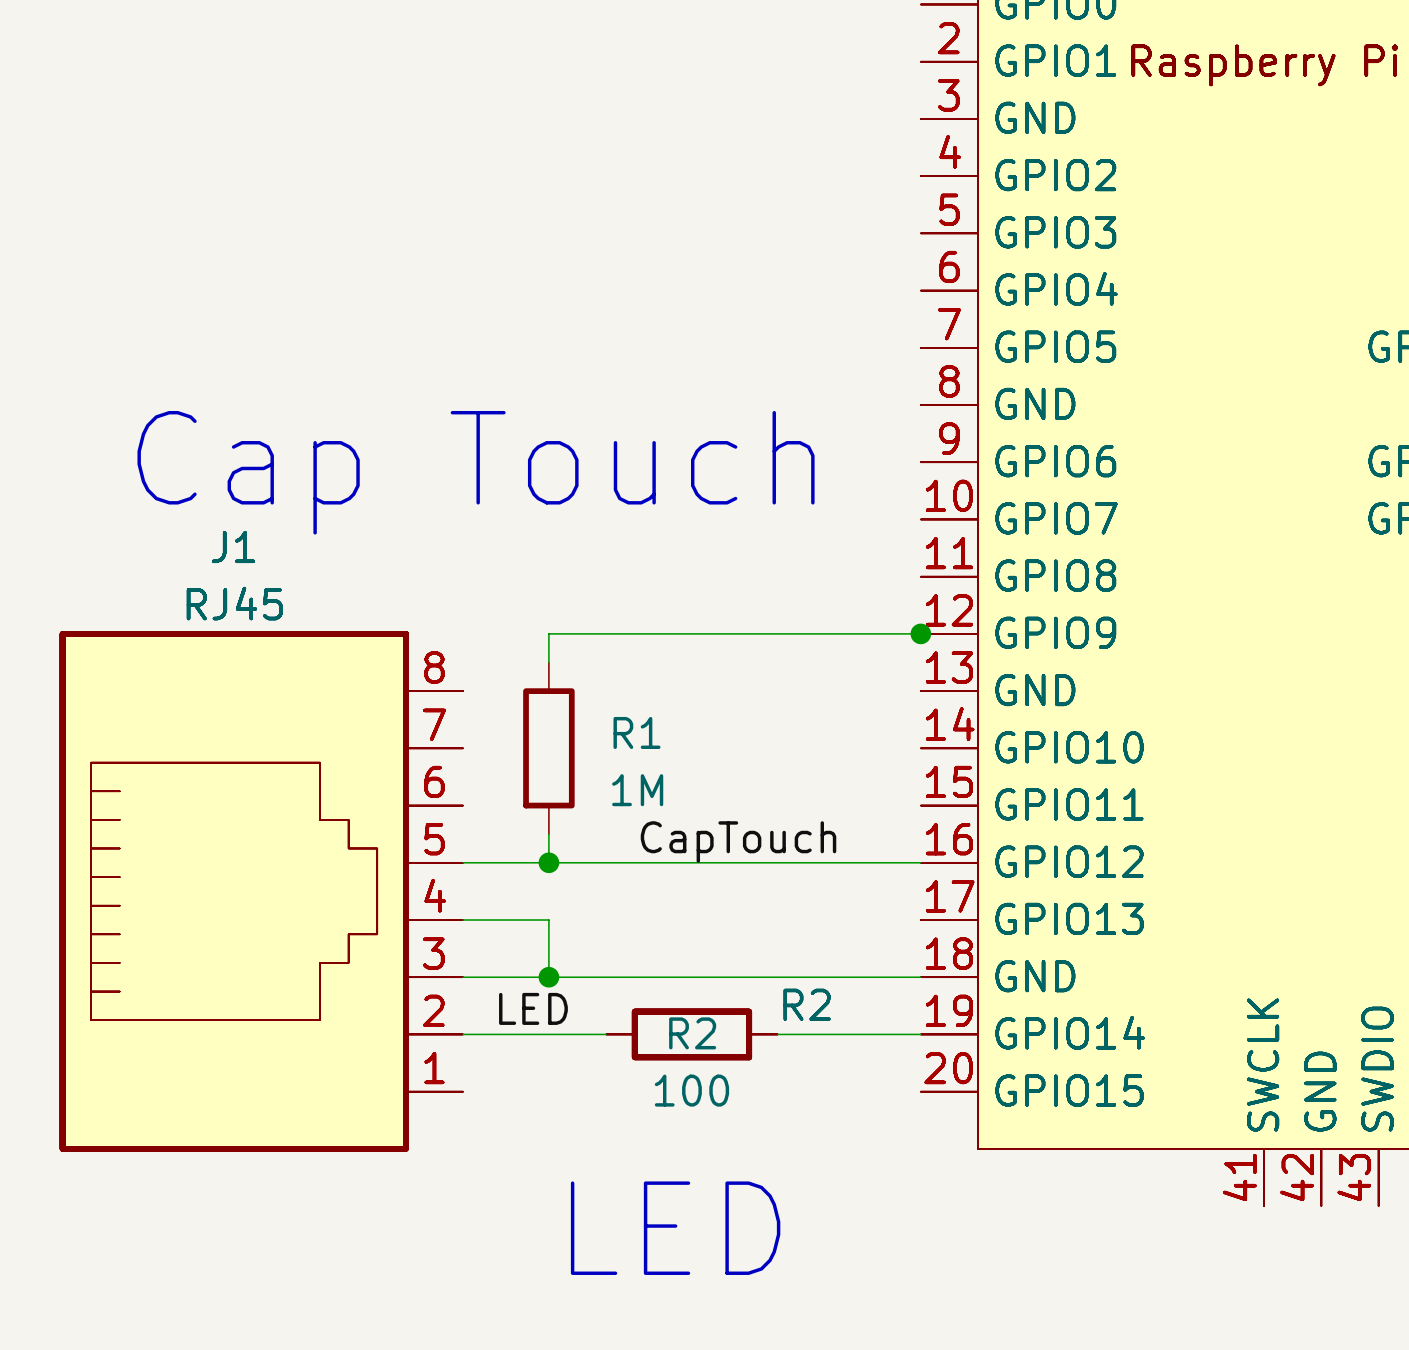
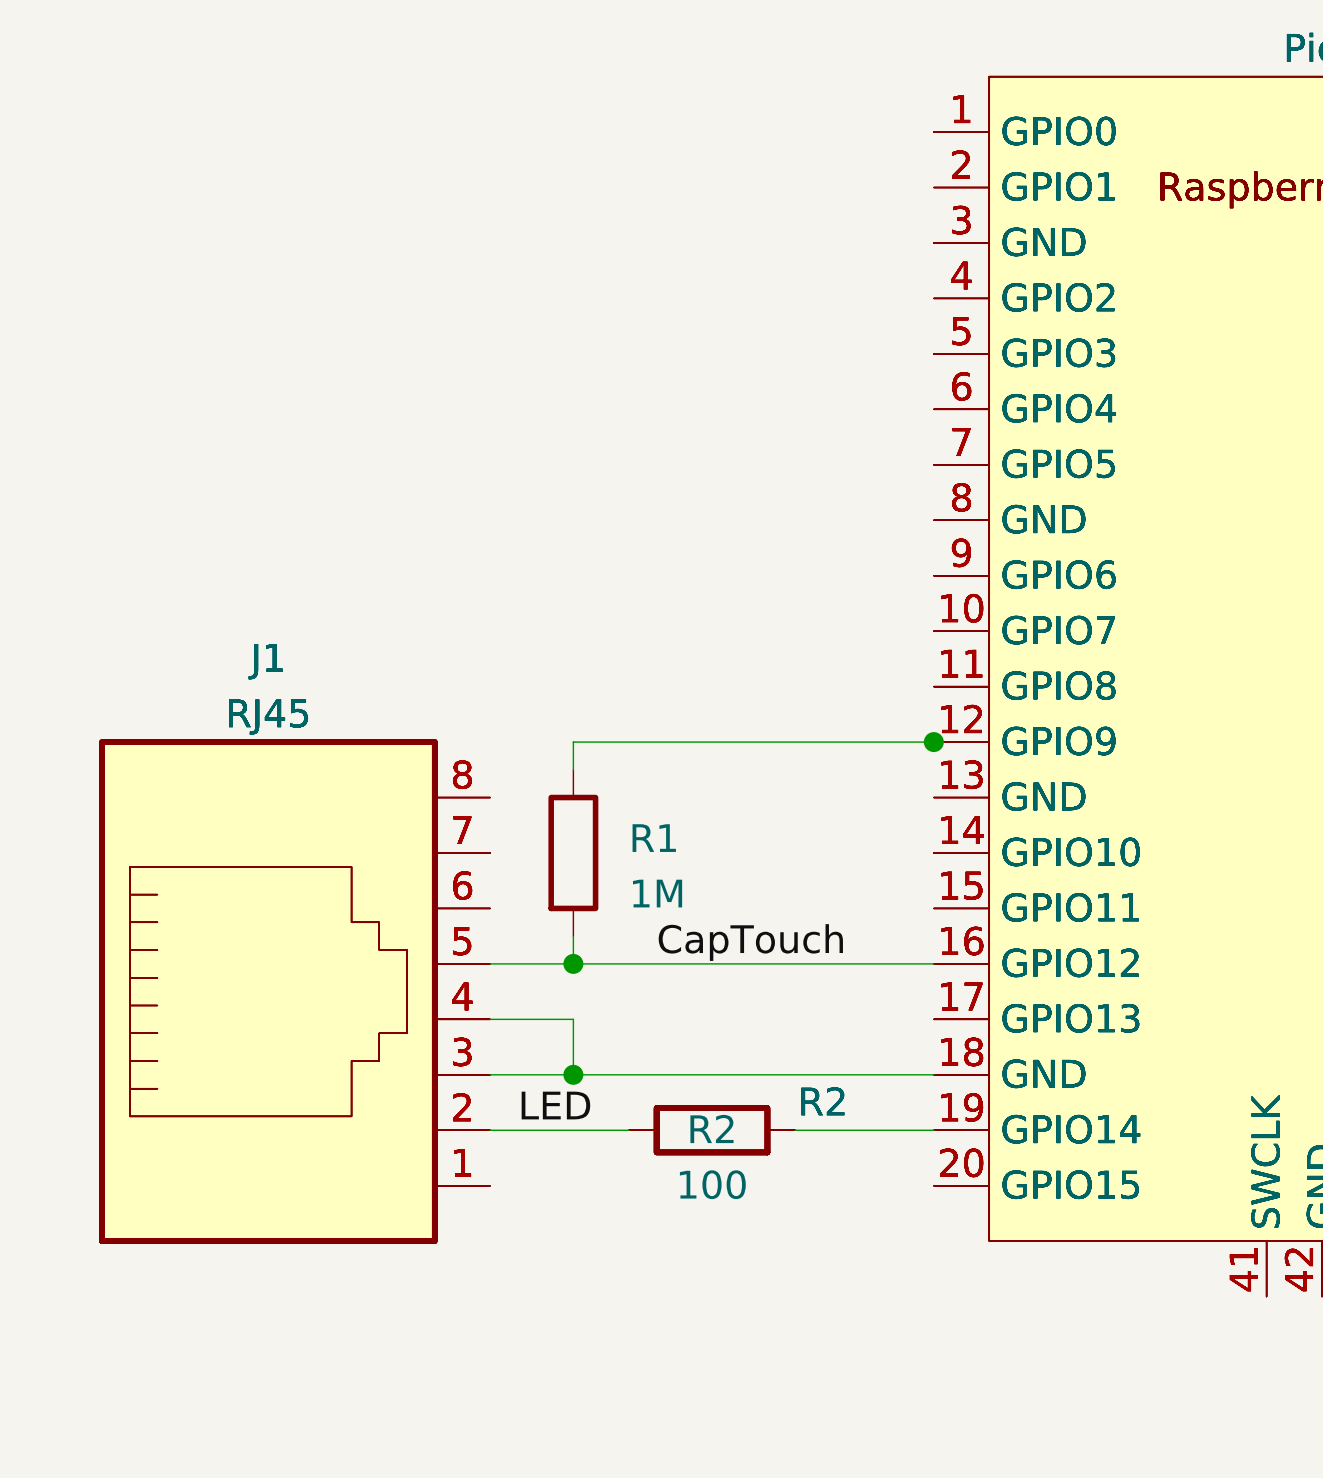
text: Cap Touch (476, 472) -> none
text: LED (675, 1228) -> none

